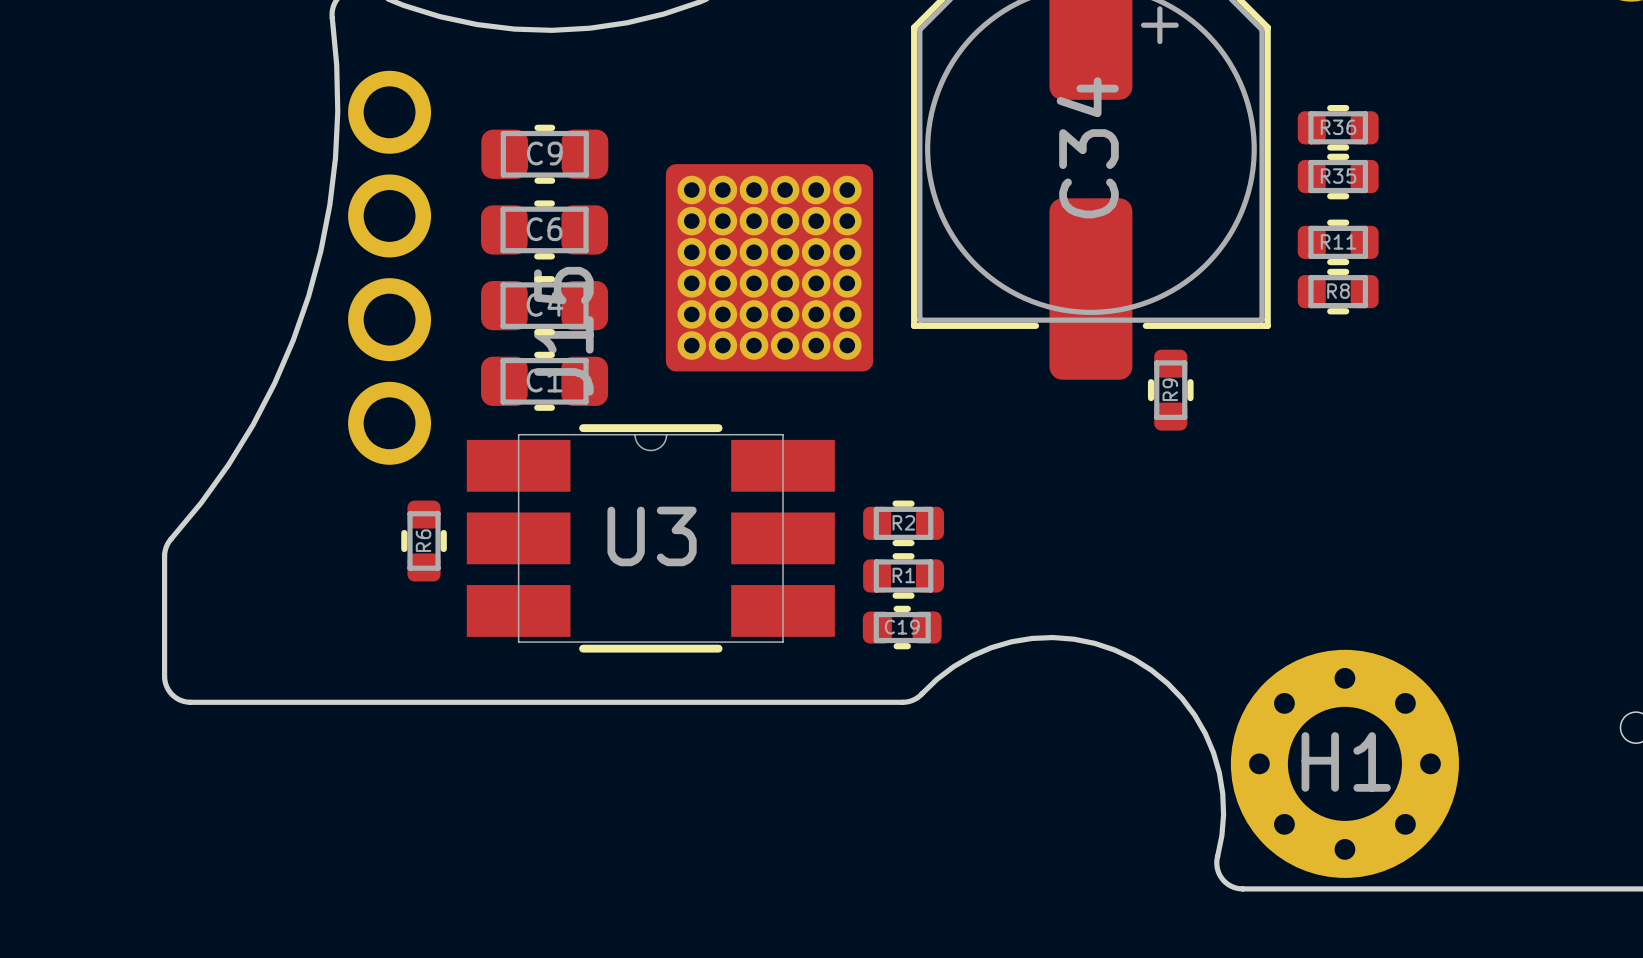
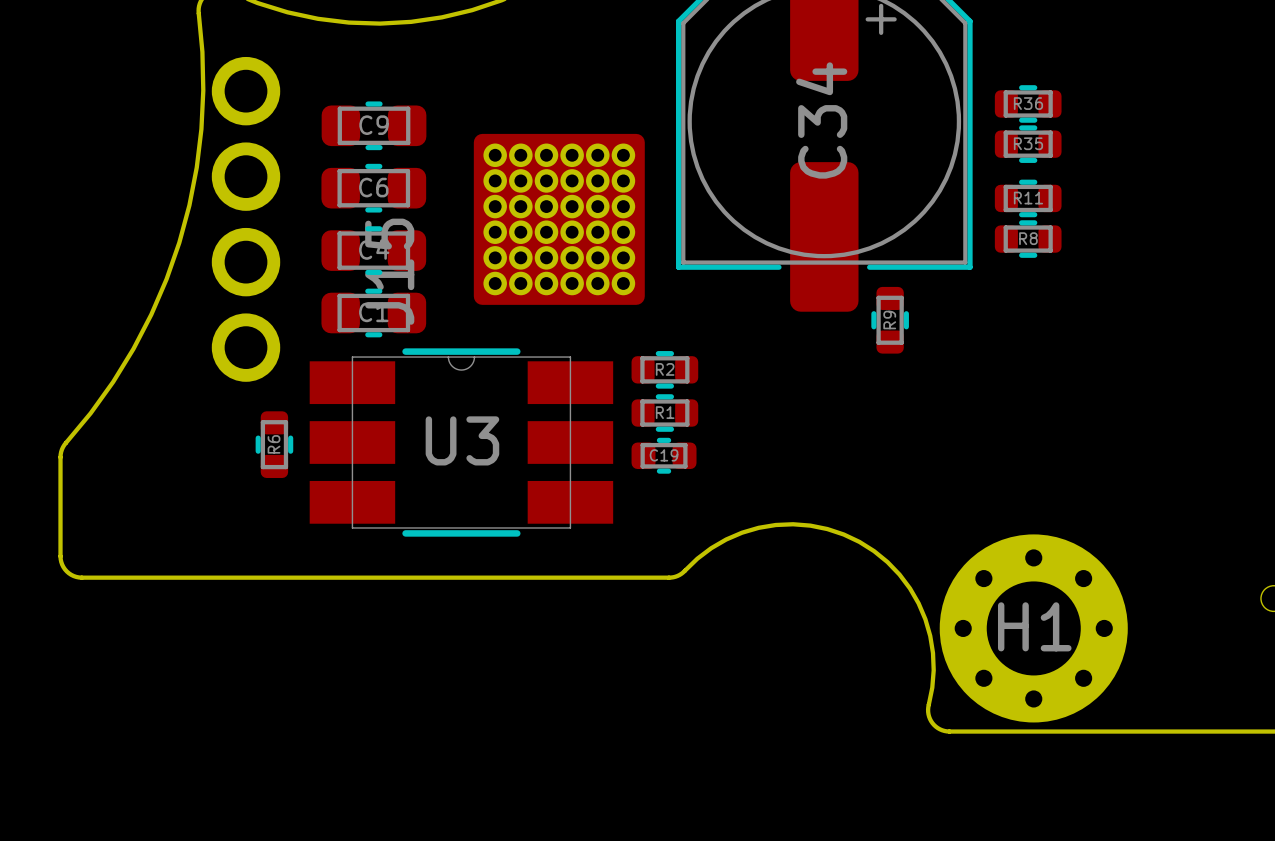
R2 position: (903, 523) -> (664, 369)
R1 position: (903, 575) -> (664, 413)
C19 position: (902, 627) -> (664, 455)

